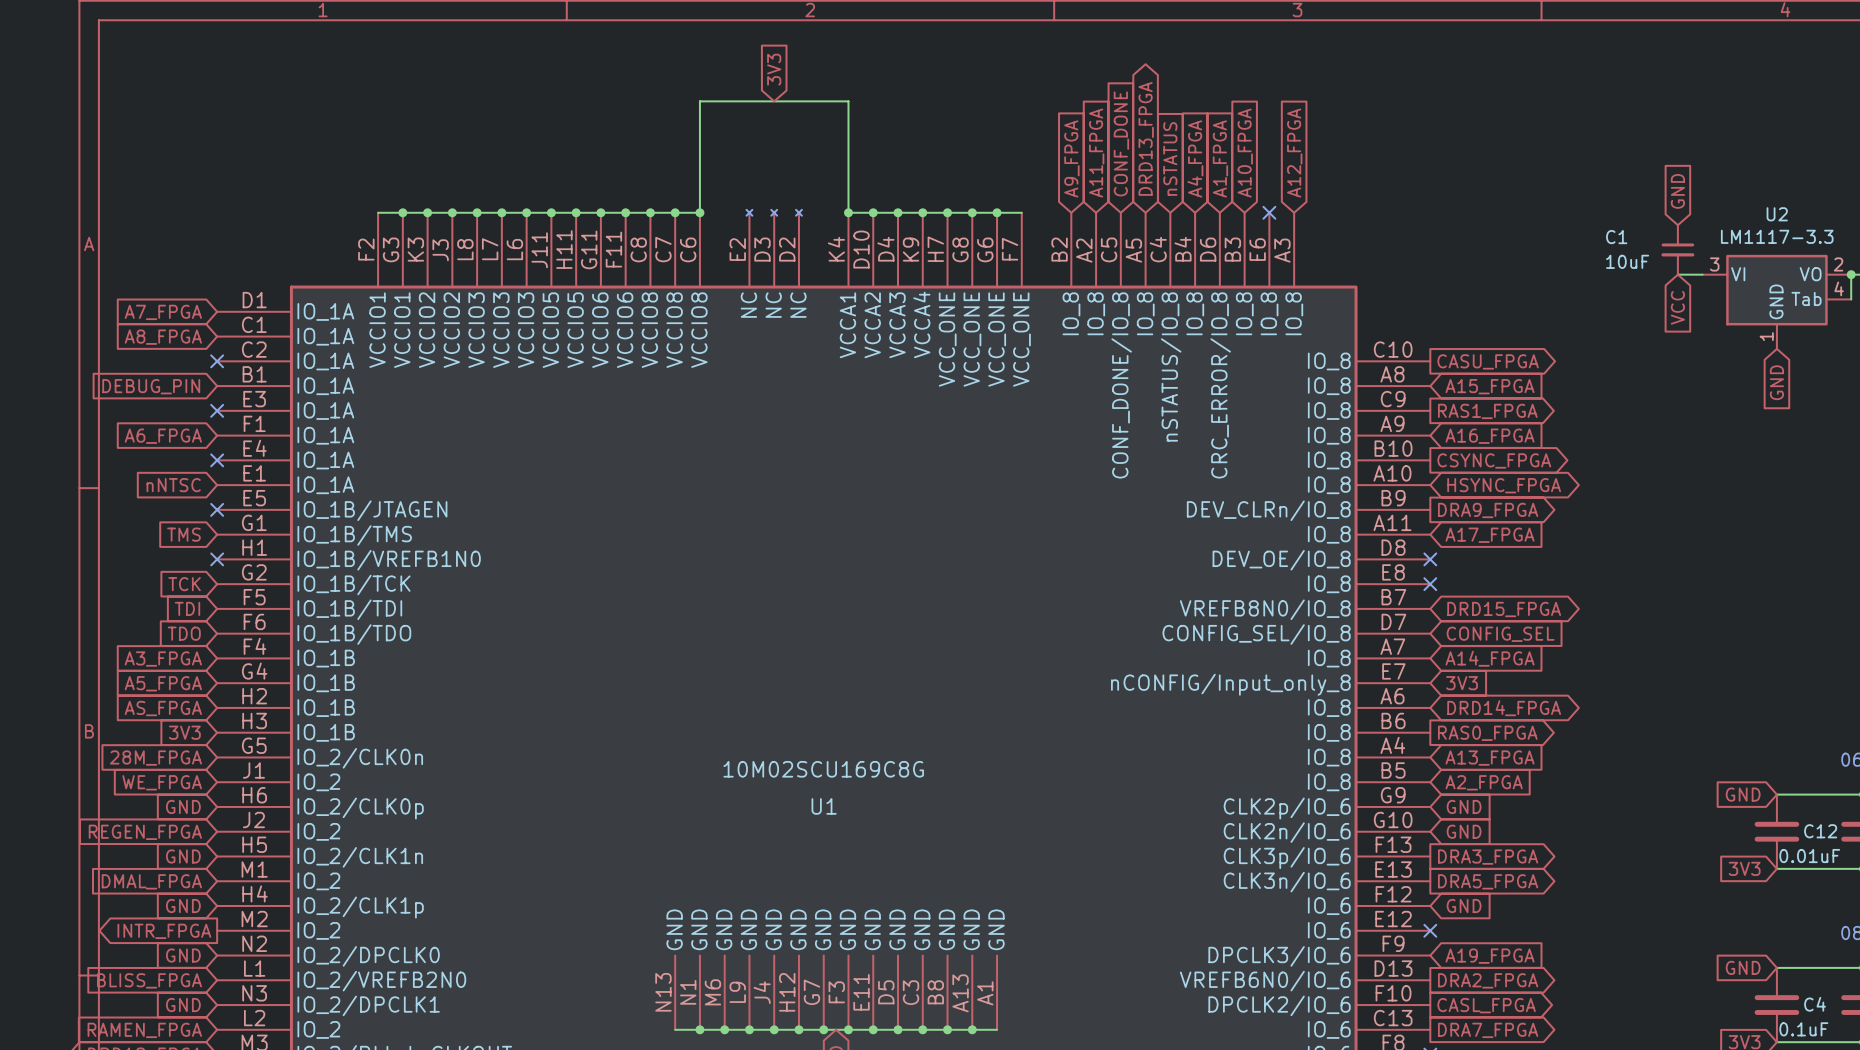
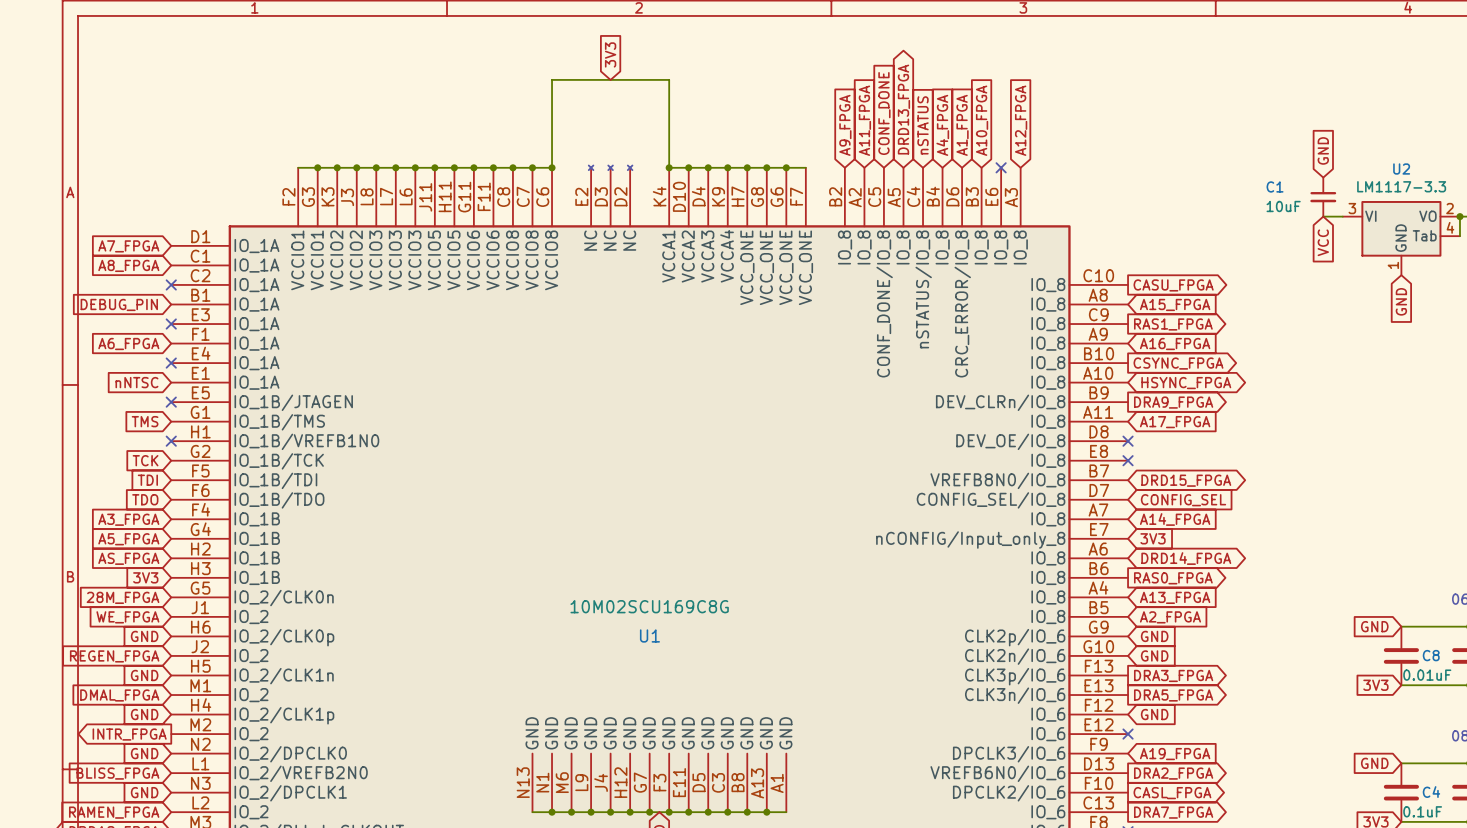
C12 name: C12 (1820, 831) -> C8 (1431, 655)

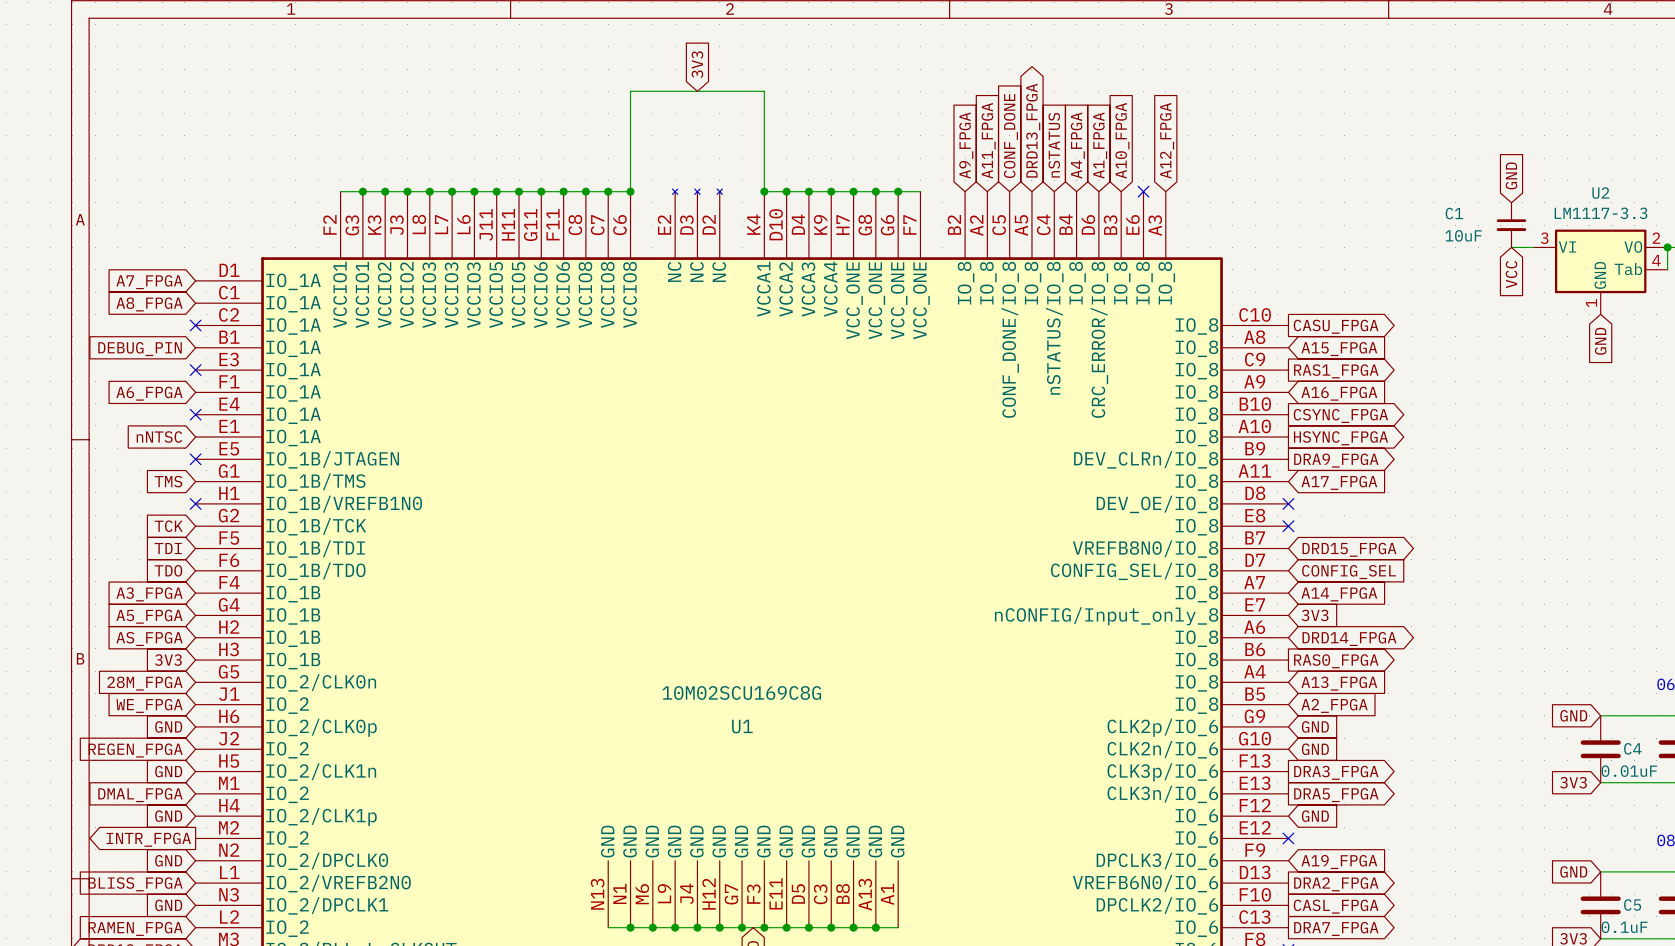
global label shape: bidirectional (1186, 383) -> output (1340, 438)
C8 name: C8 (1431, 655) -> C4 (1632, 748)
C4 name: C4 (1431, 792) -> C5 (1632, 904)

